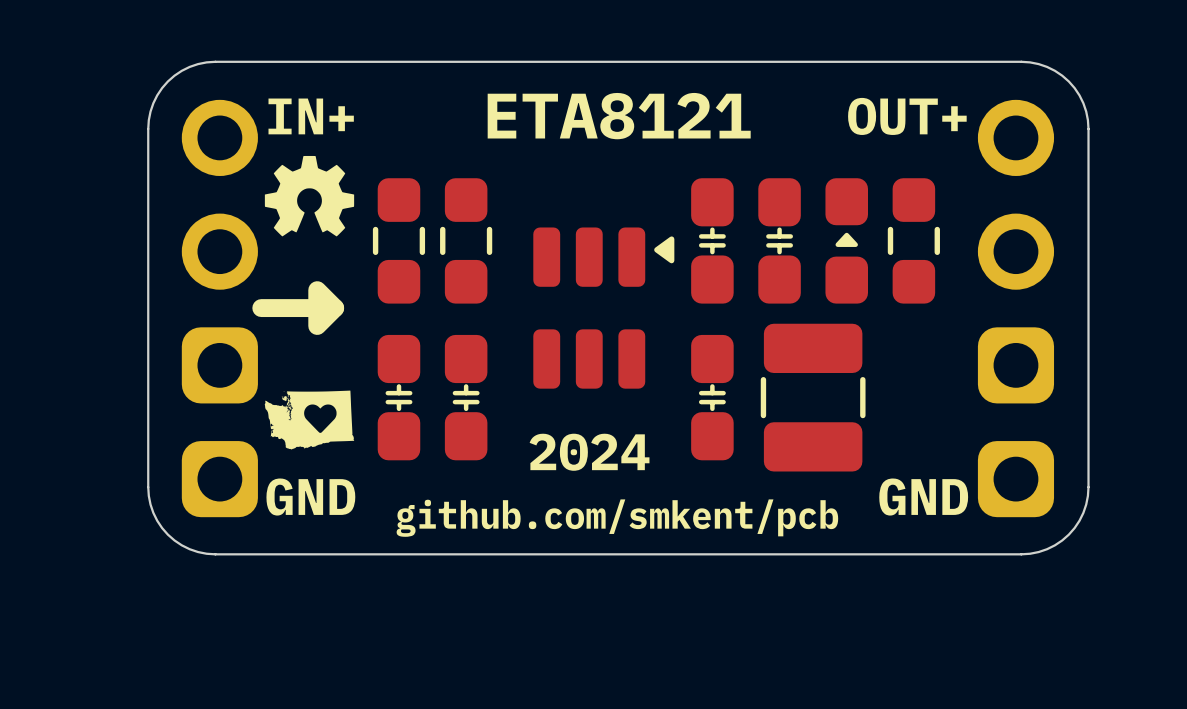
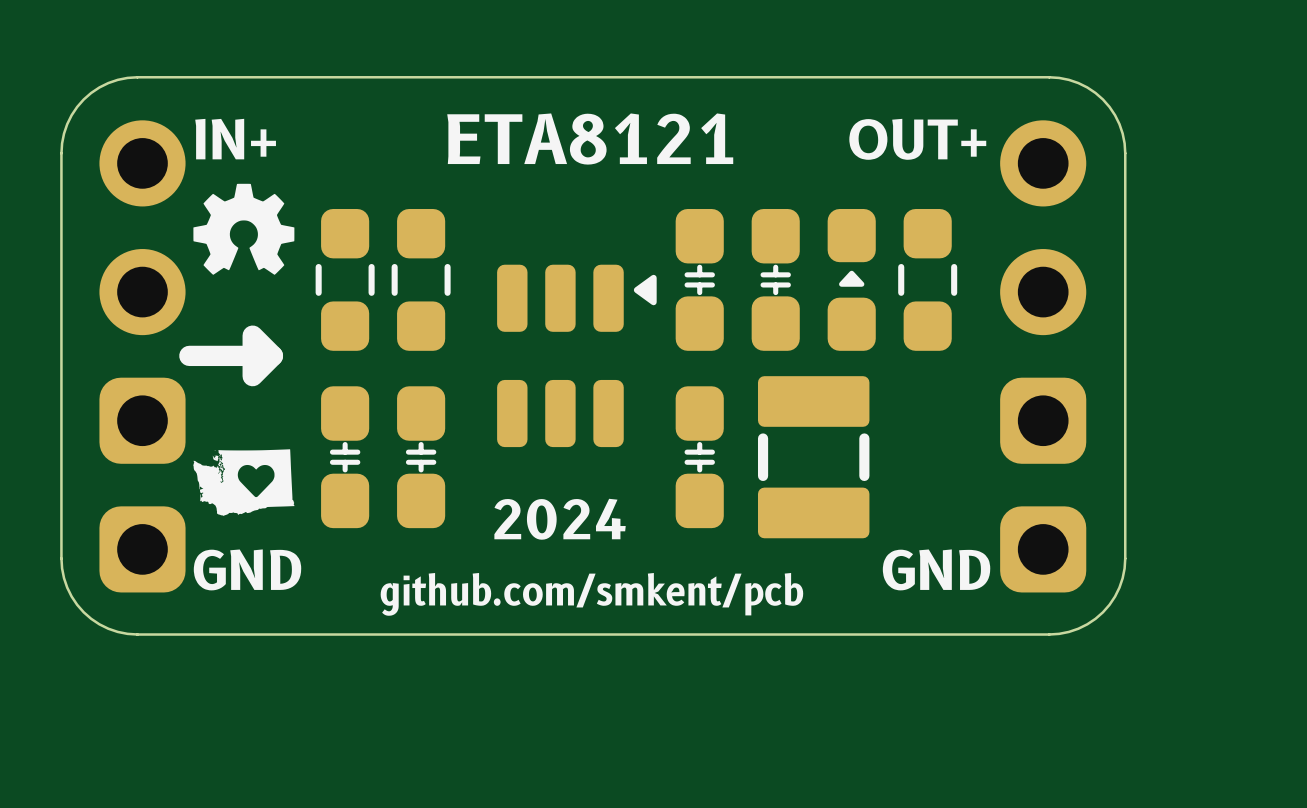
part footprint: [760, 323, 866, 472] -> [757, 376, 870, 539]

